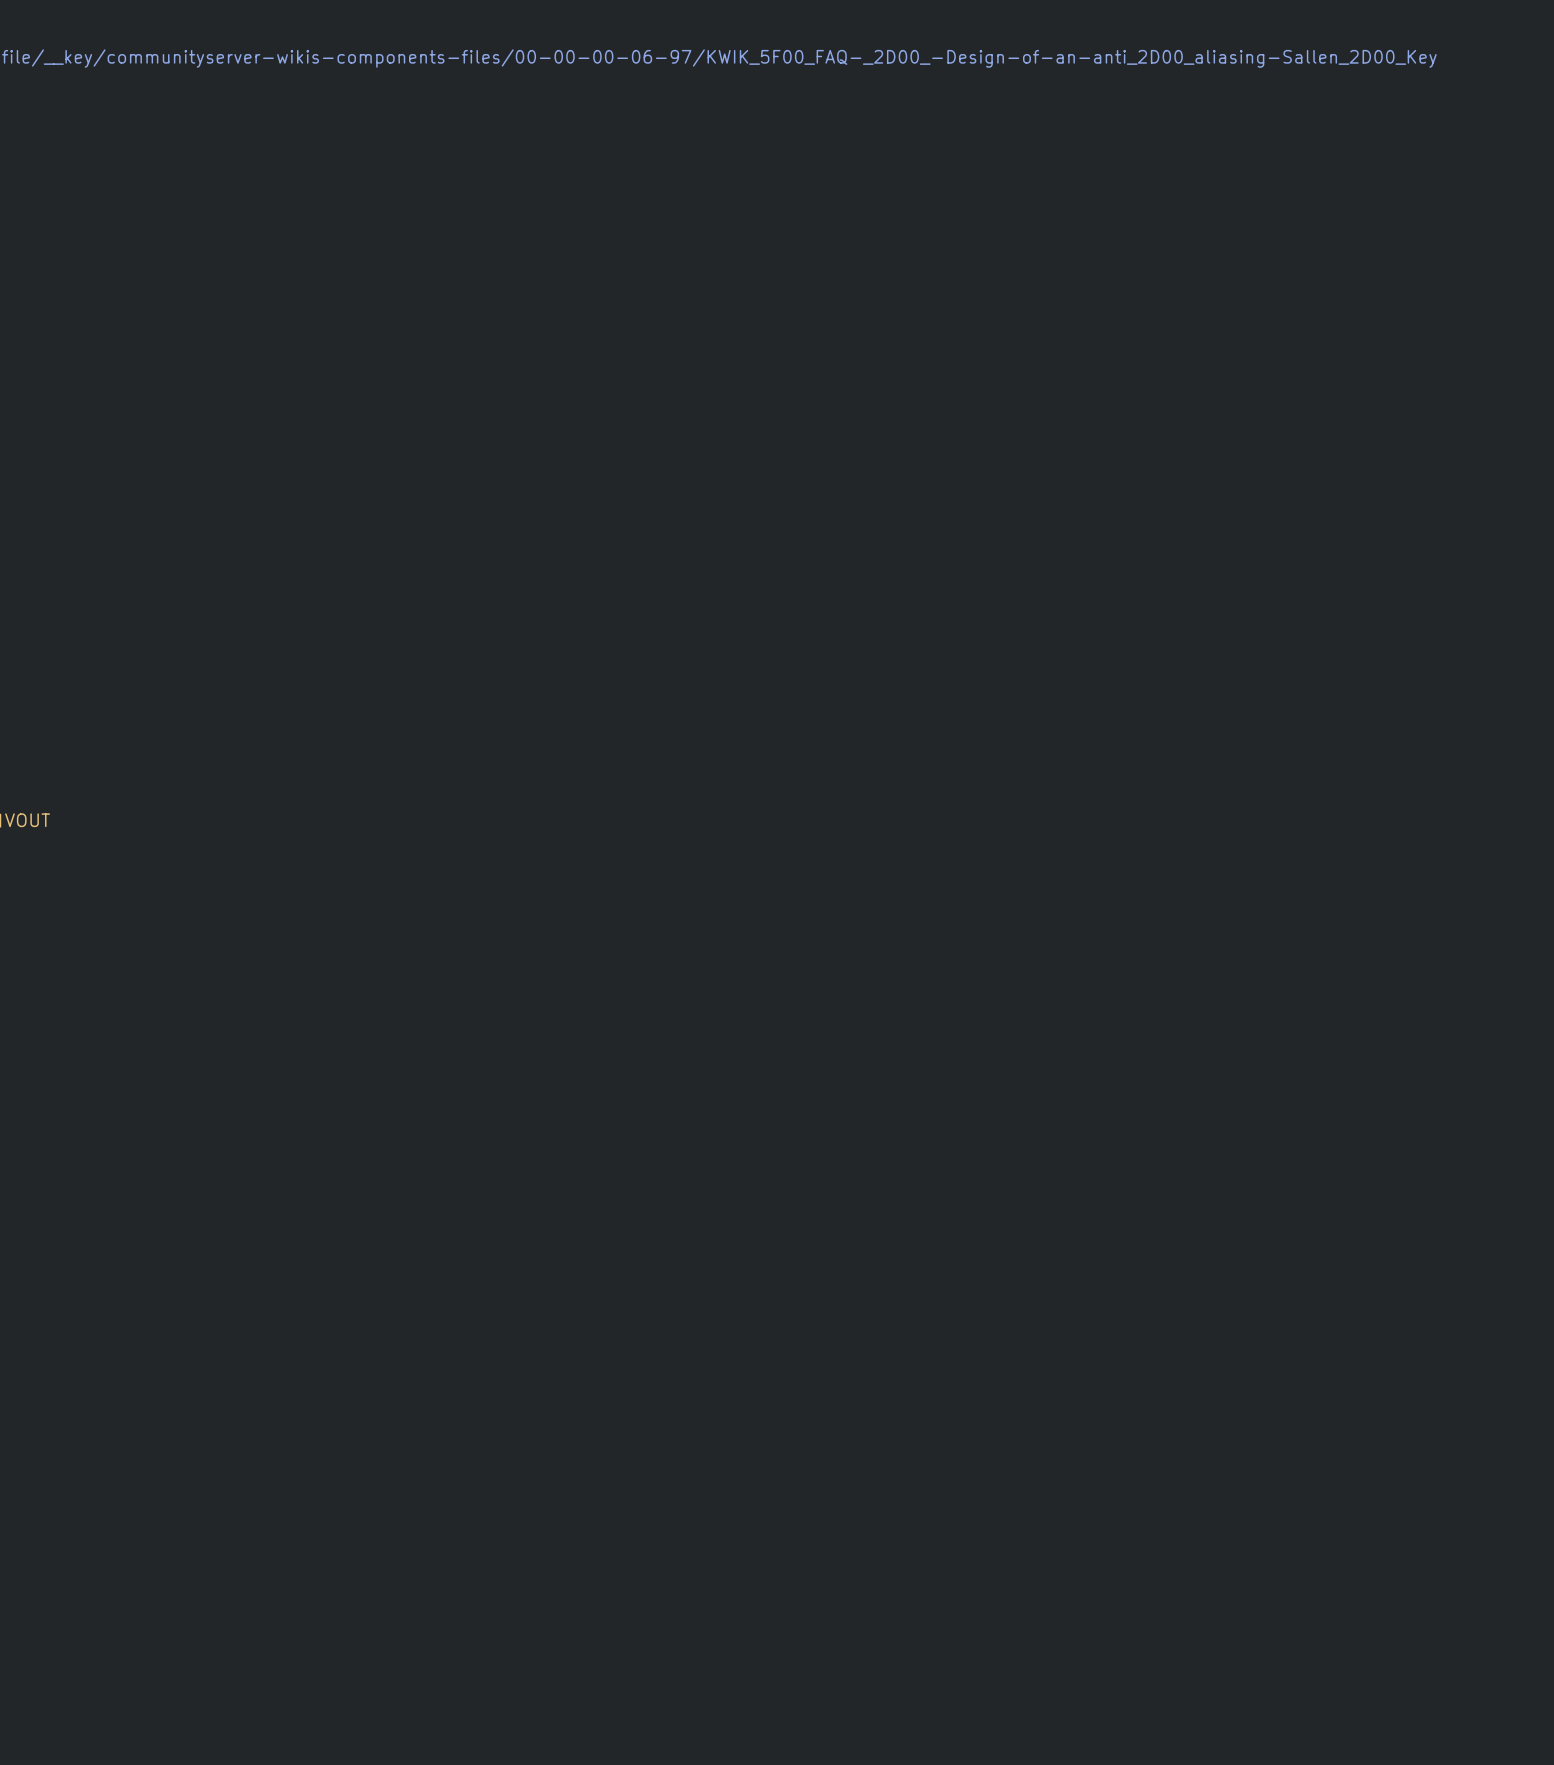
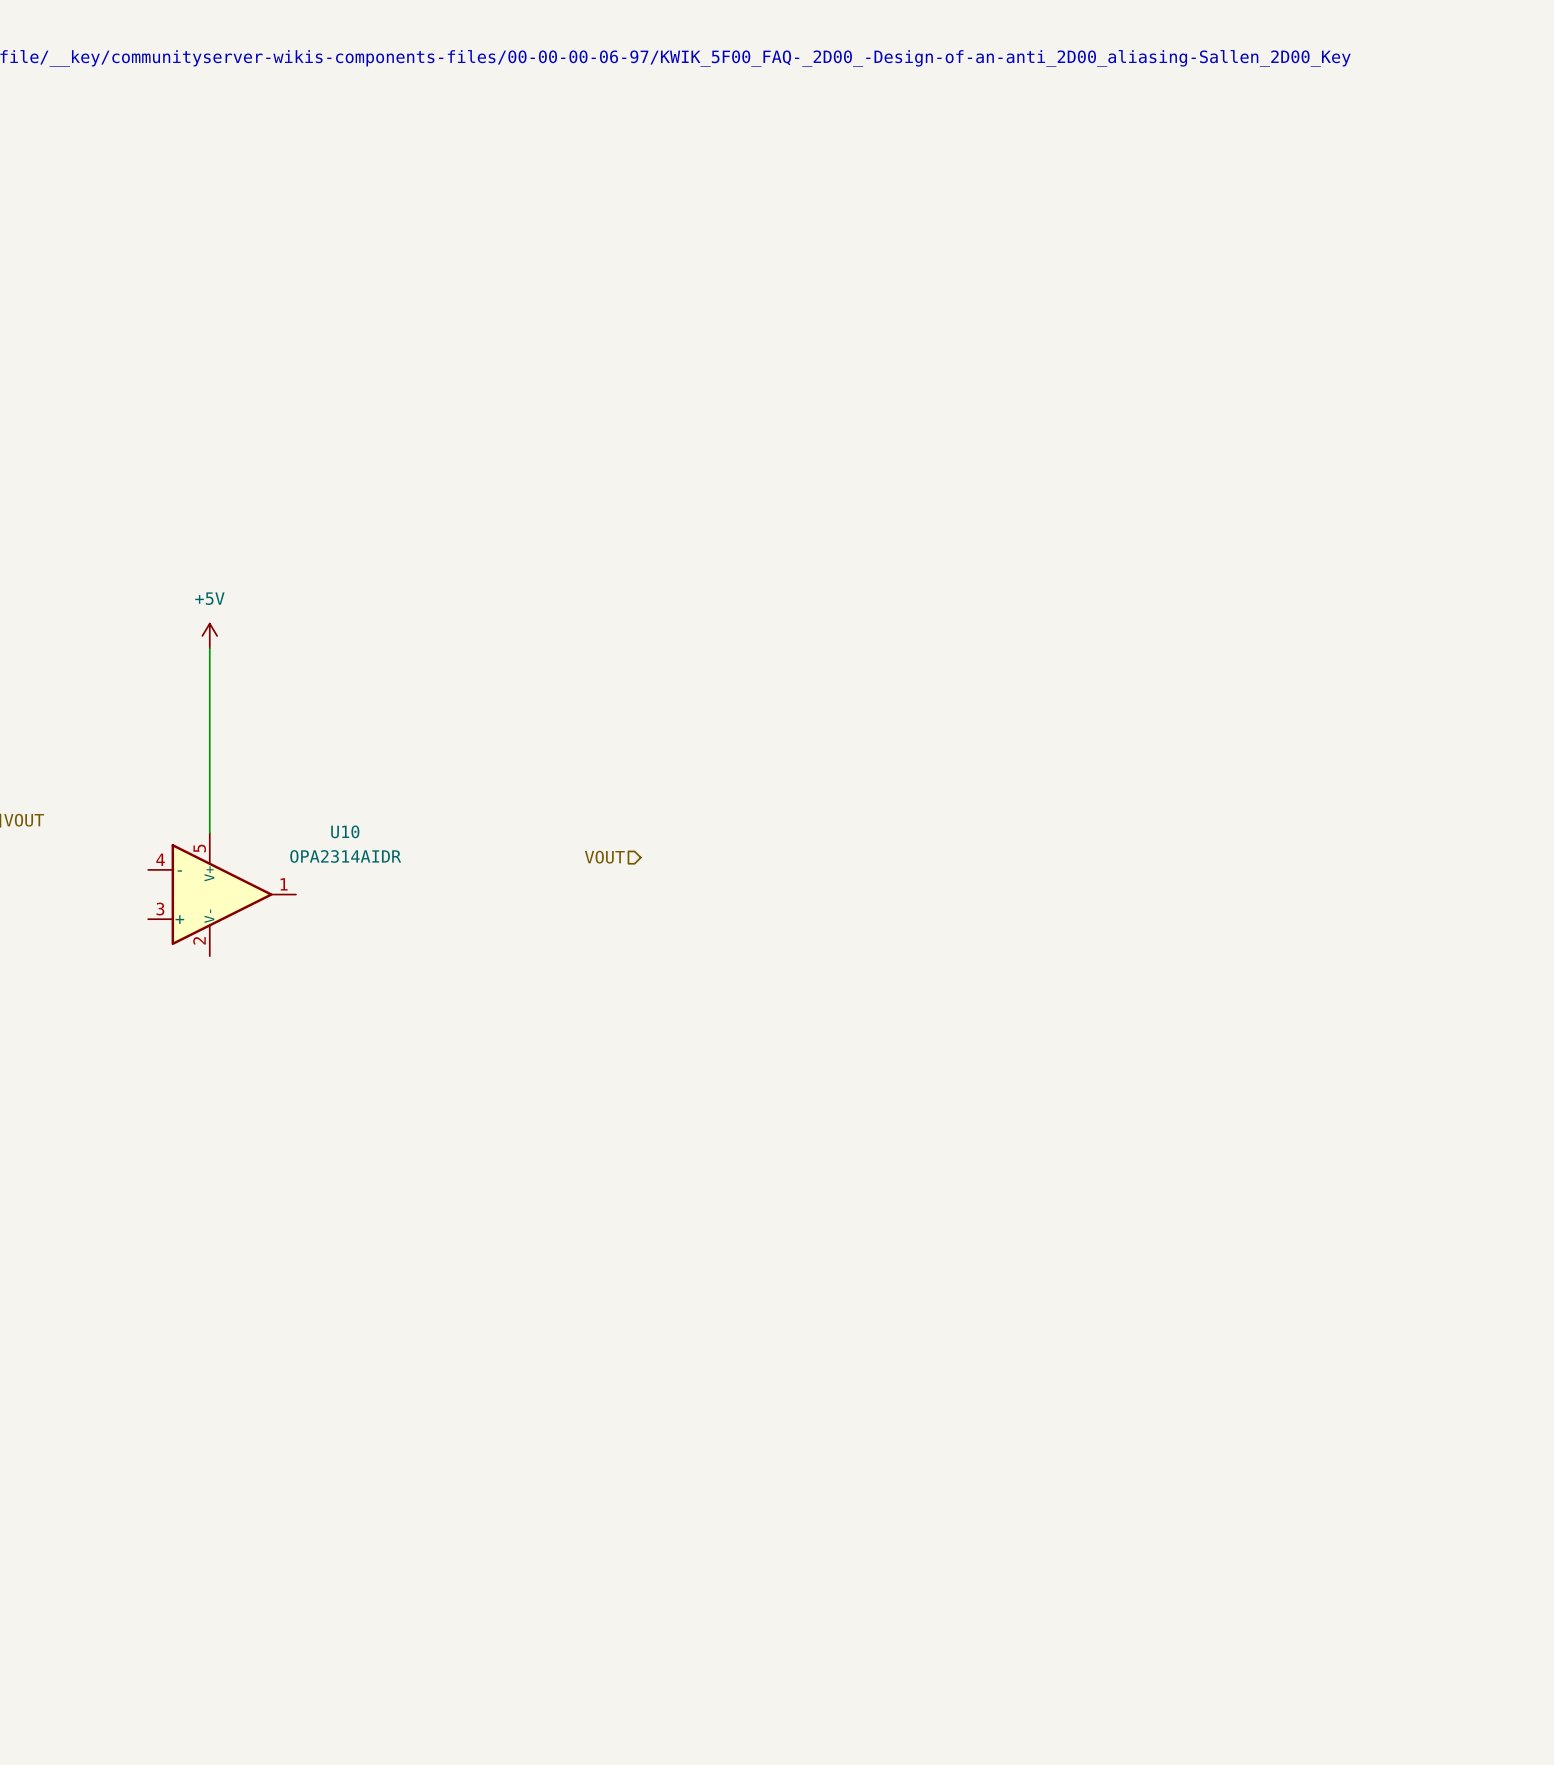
power symbol: none -> +5V (209, 635)
wire: none -> (209, 648) (209, 832)
hierarchical label: none -> VOUT (604, 857)
U10: none -> OPA2314AIDR (222, 894)

